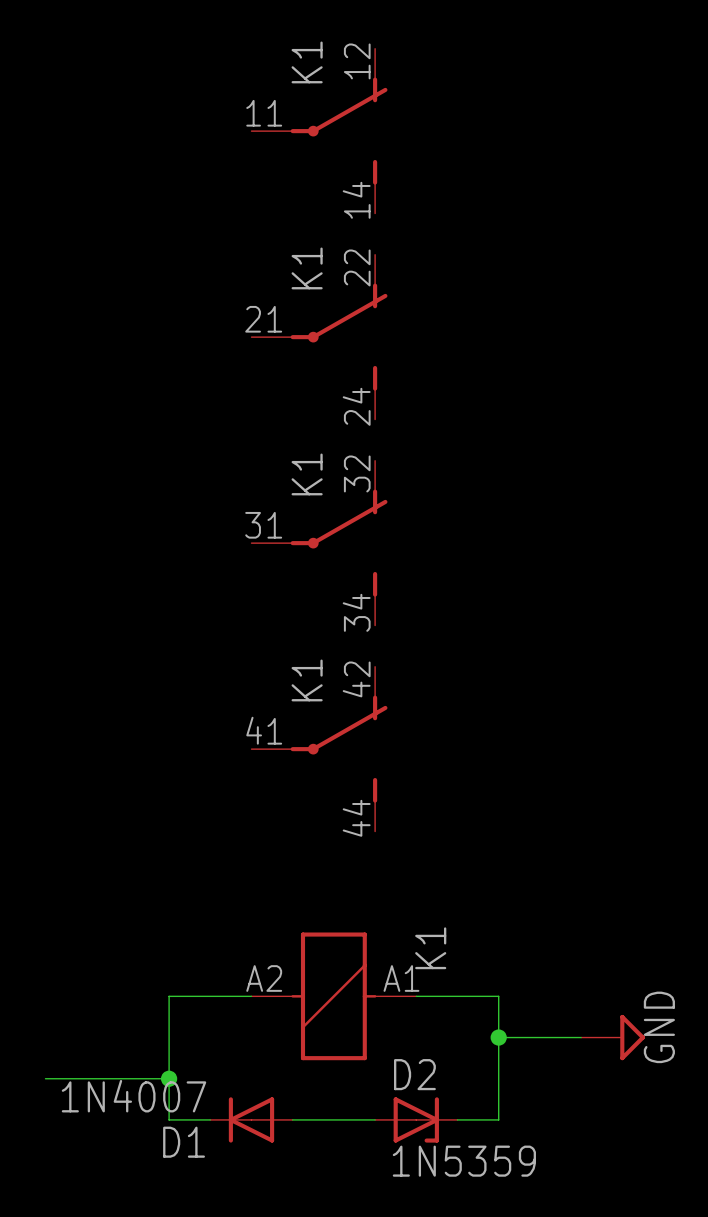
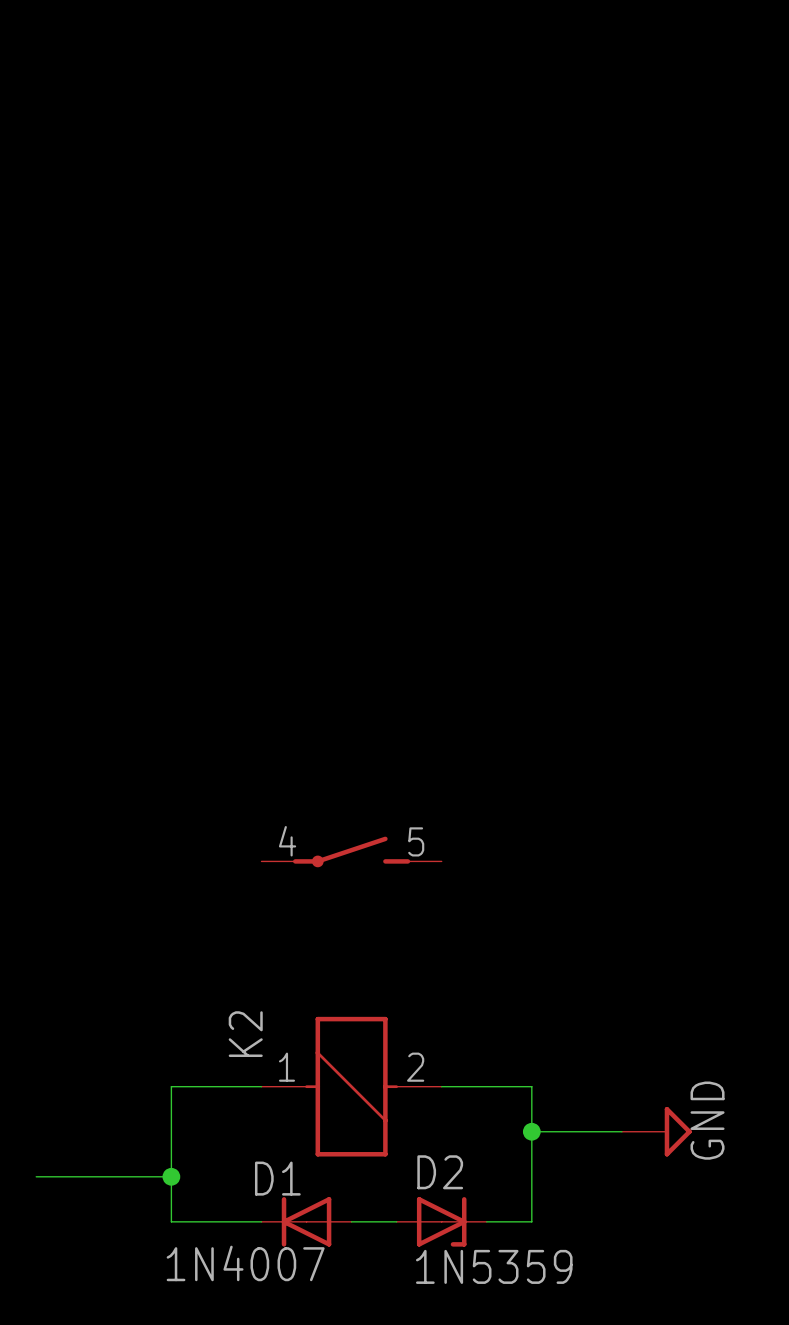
K1: (319, 131) -> none
K1: (319, 337) -> none
K1: (319, 543) -> none
K1: (319, 749) -> none
part: none -> (351, 851)
K1: (333, 996) -> none
K2: none -> (351, 1086)
D1 value position: 1N4007 (133, 1096) -> 1N4007 (245, 1263)
D1 position: (251, 1119) -> (306, 1221)
D1 name position: D1 (184, 1142) -> D1 (277, 1178)

